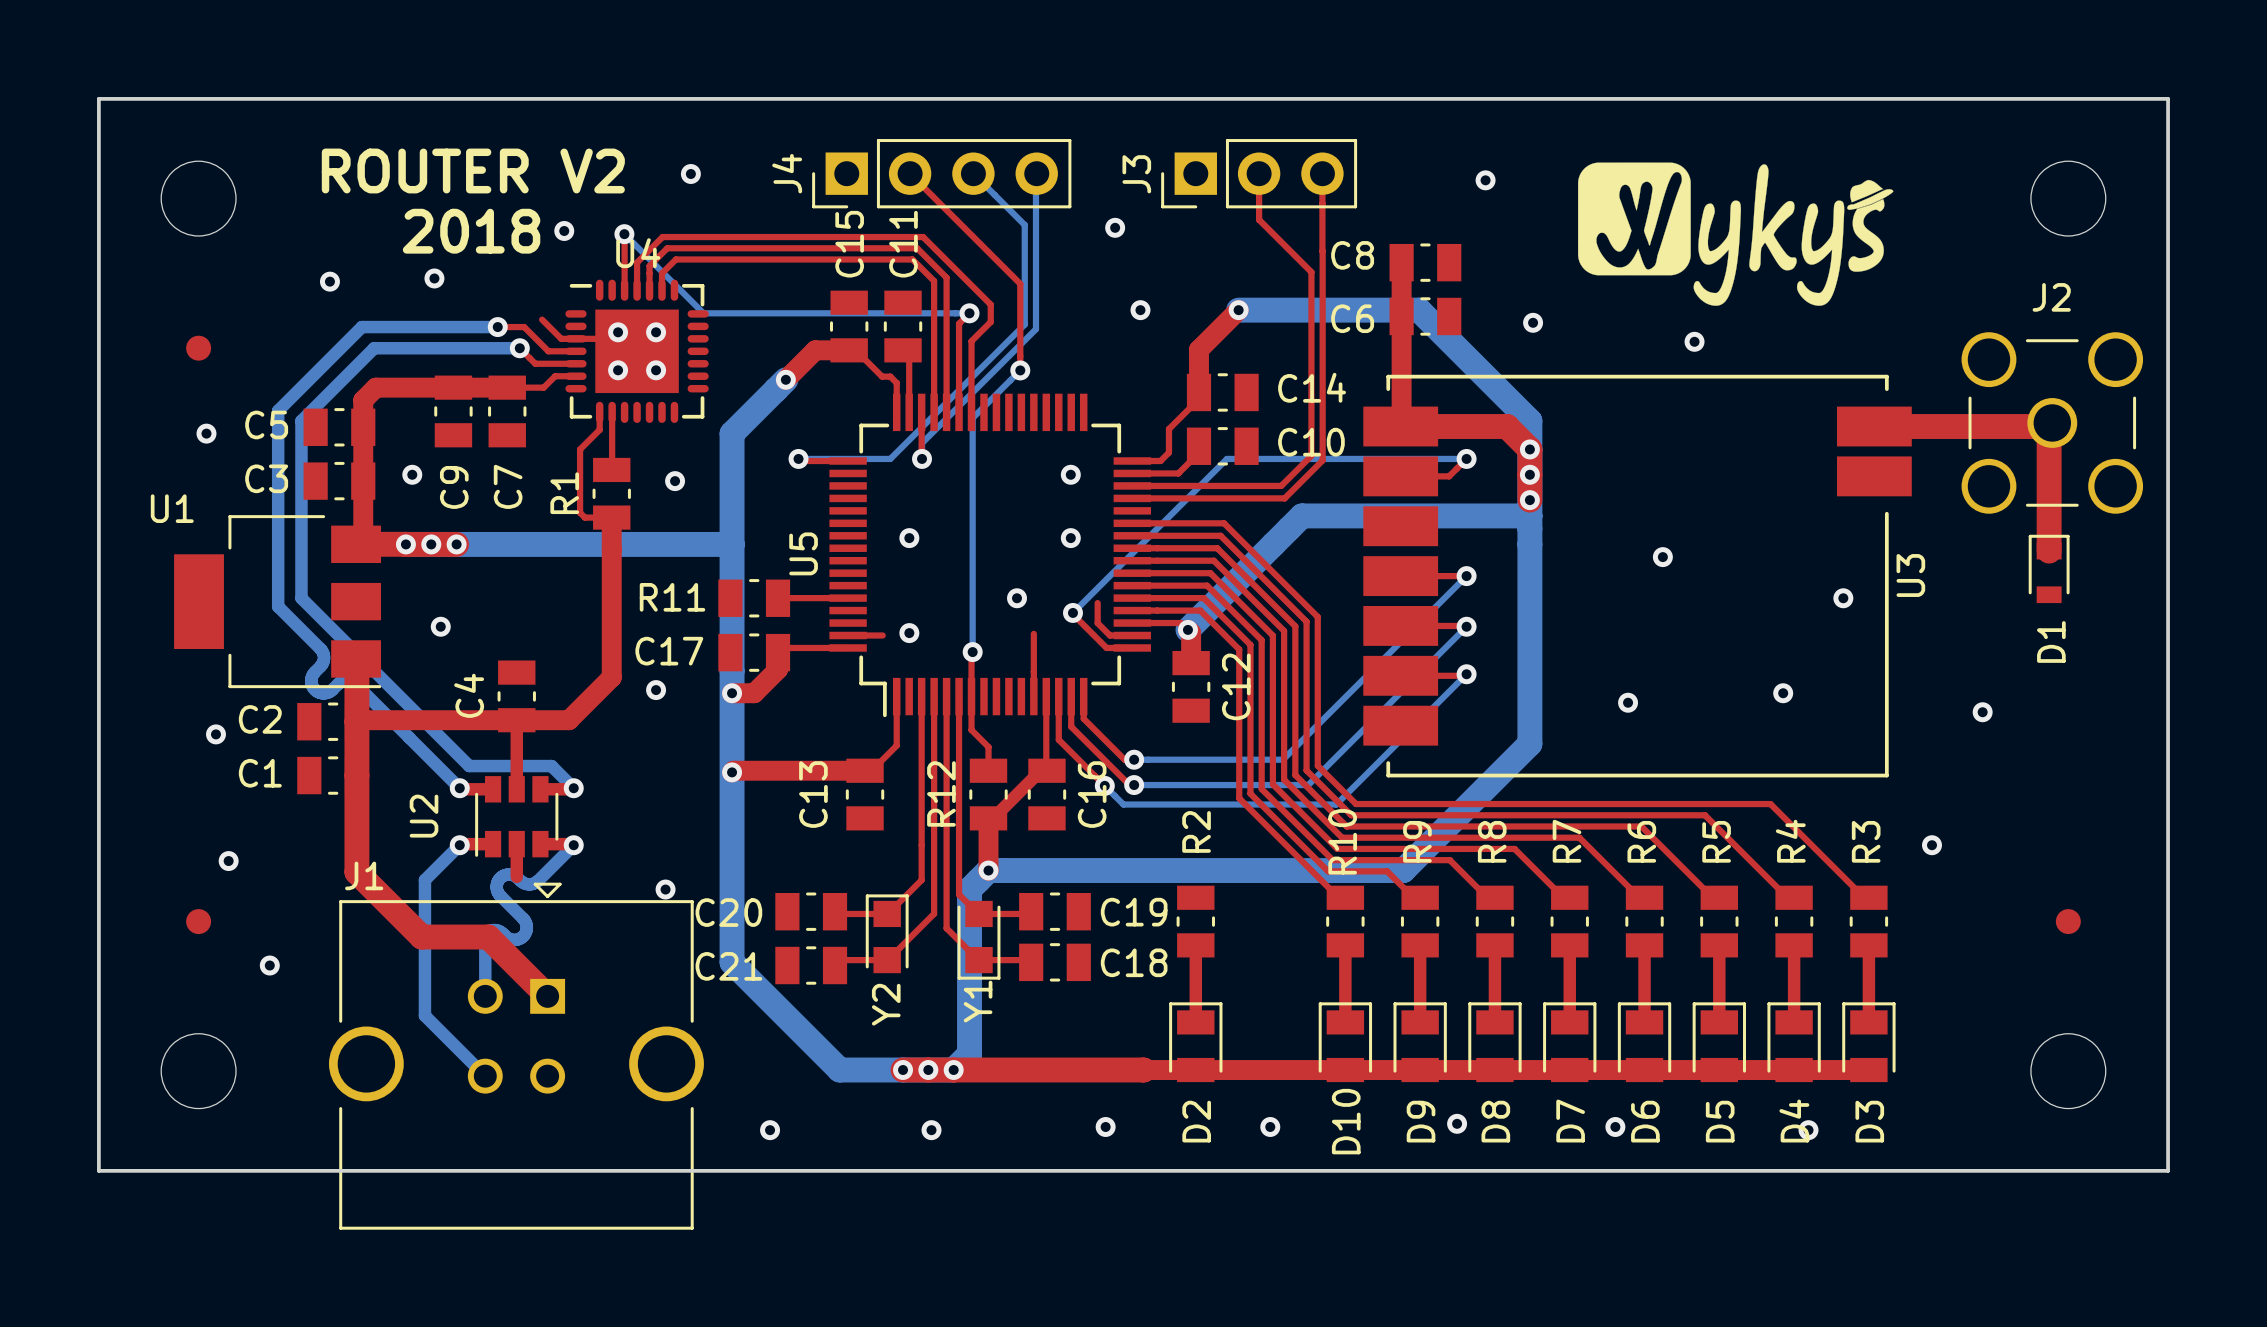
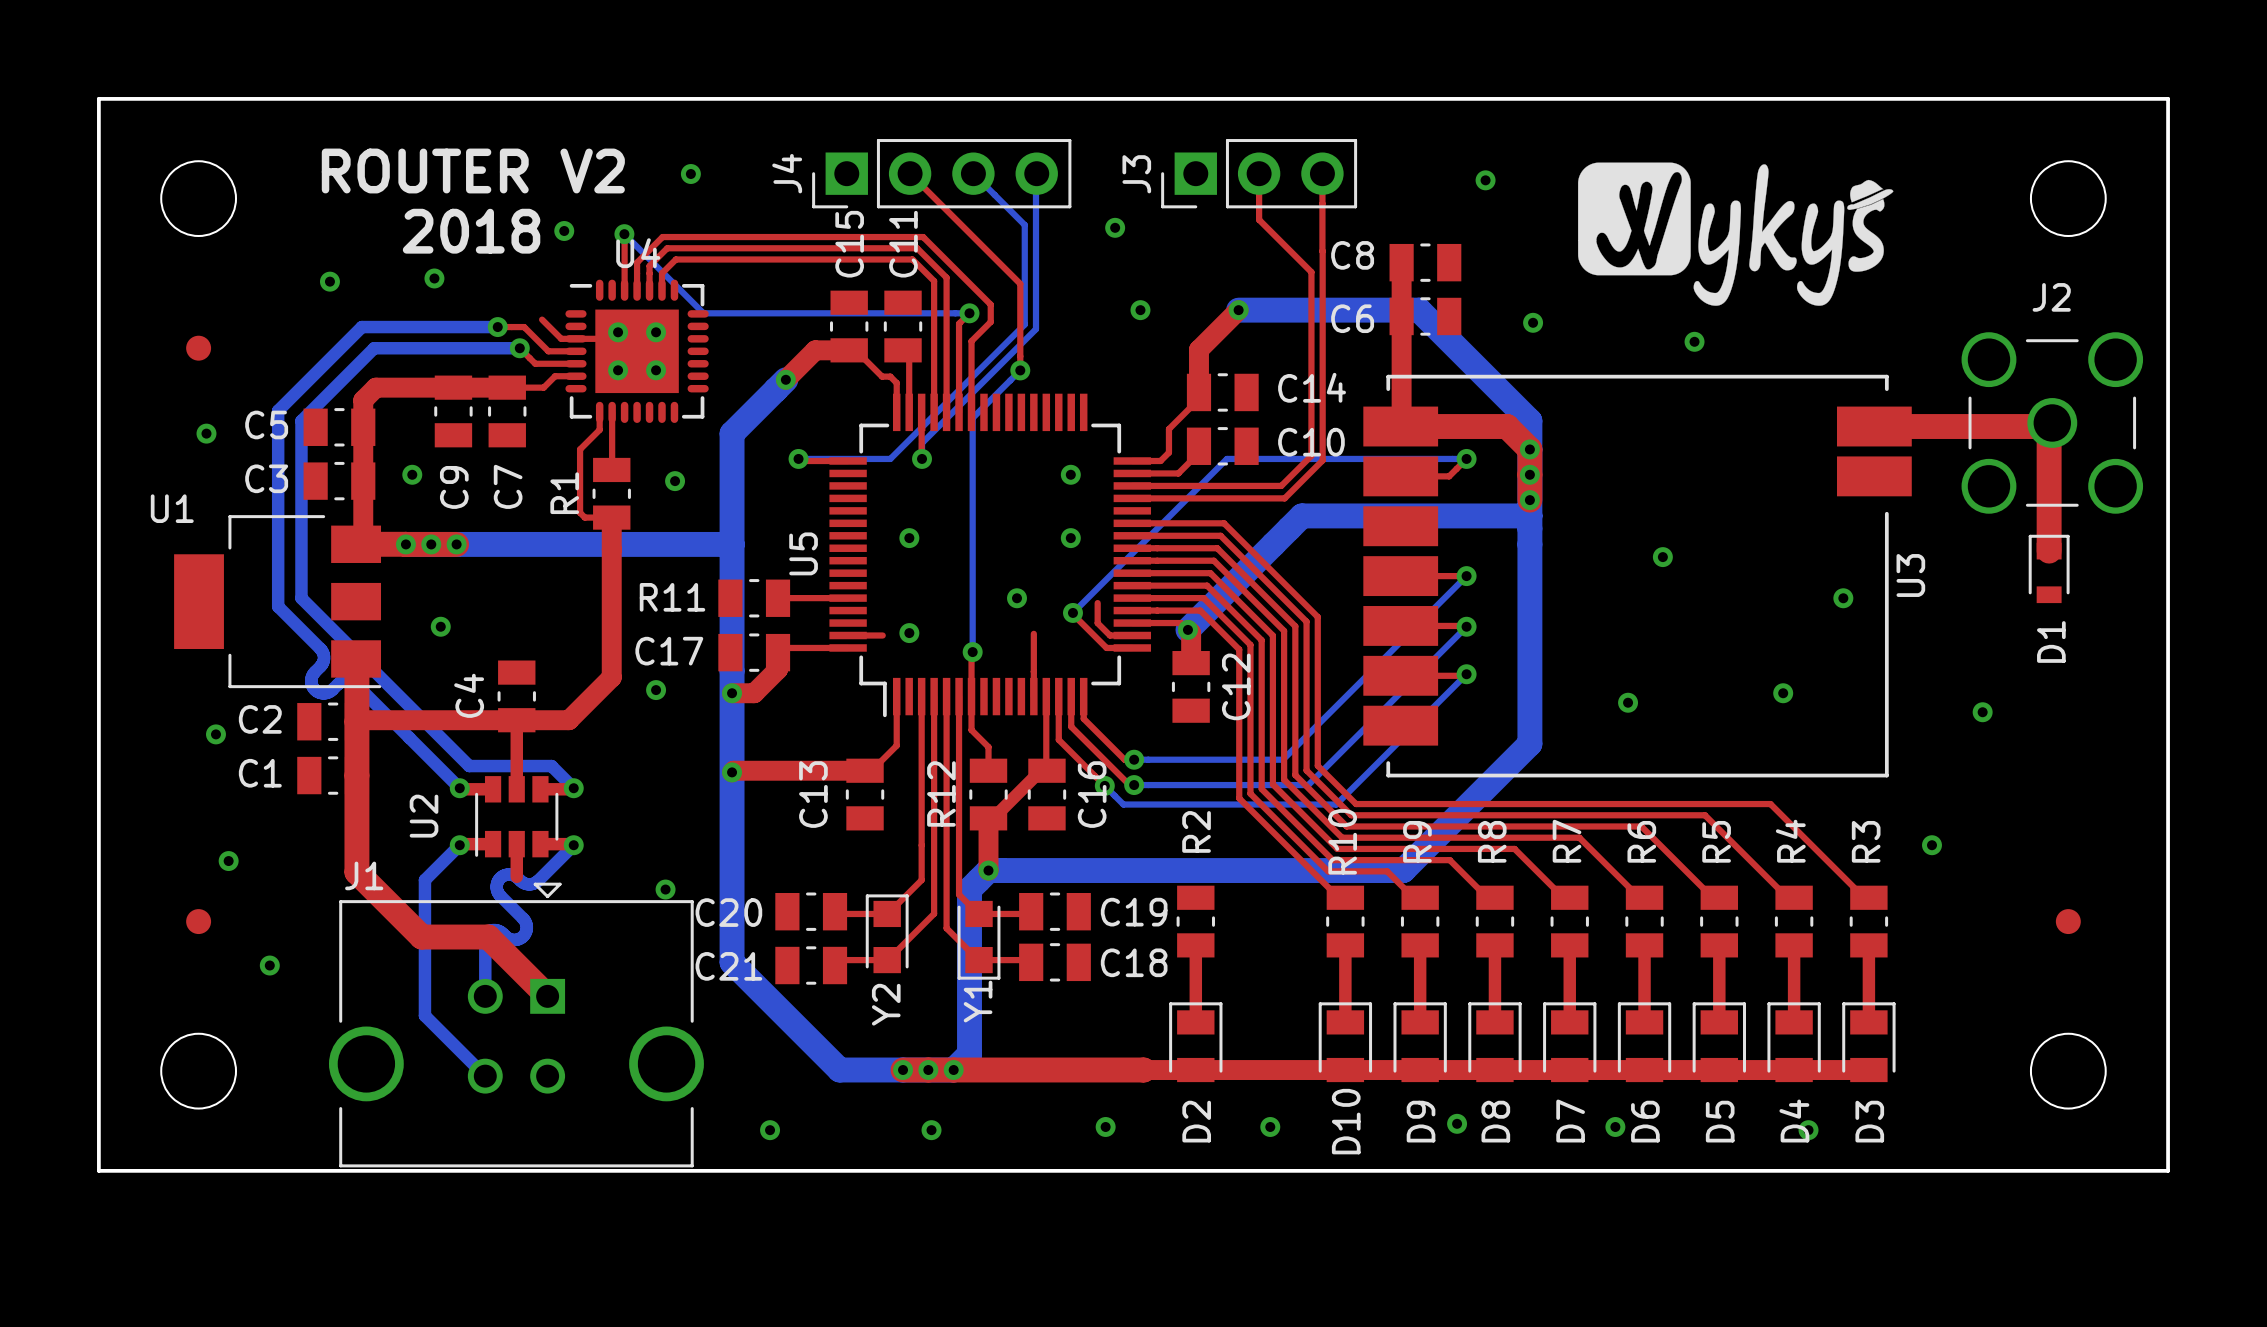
J1 footprint: [328, 882, 704, 1230] -> [328, 882, 704, 1168]

